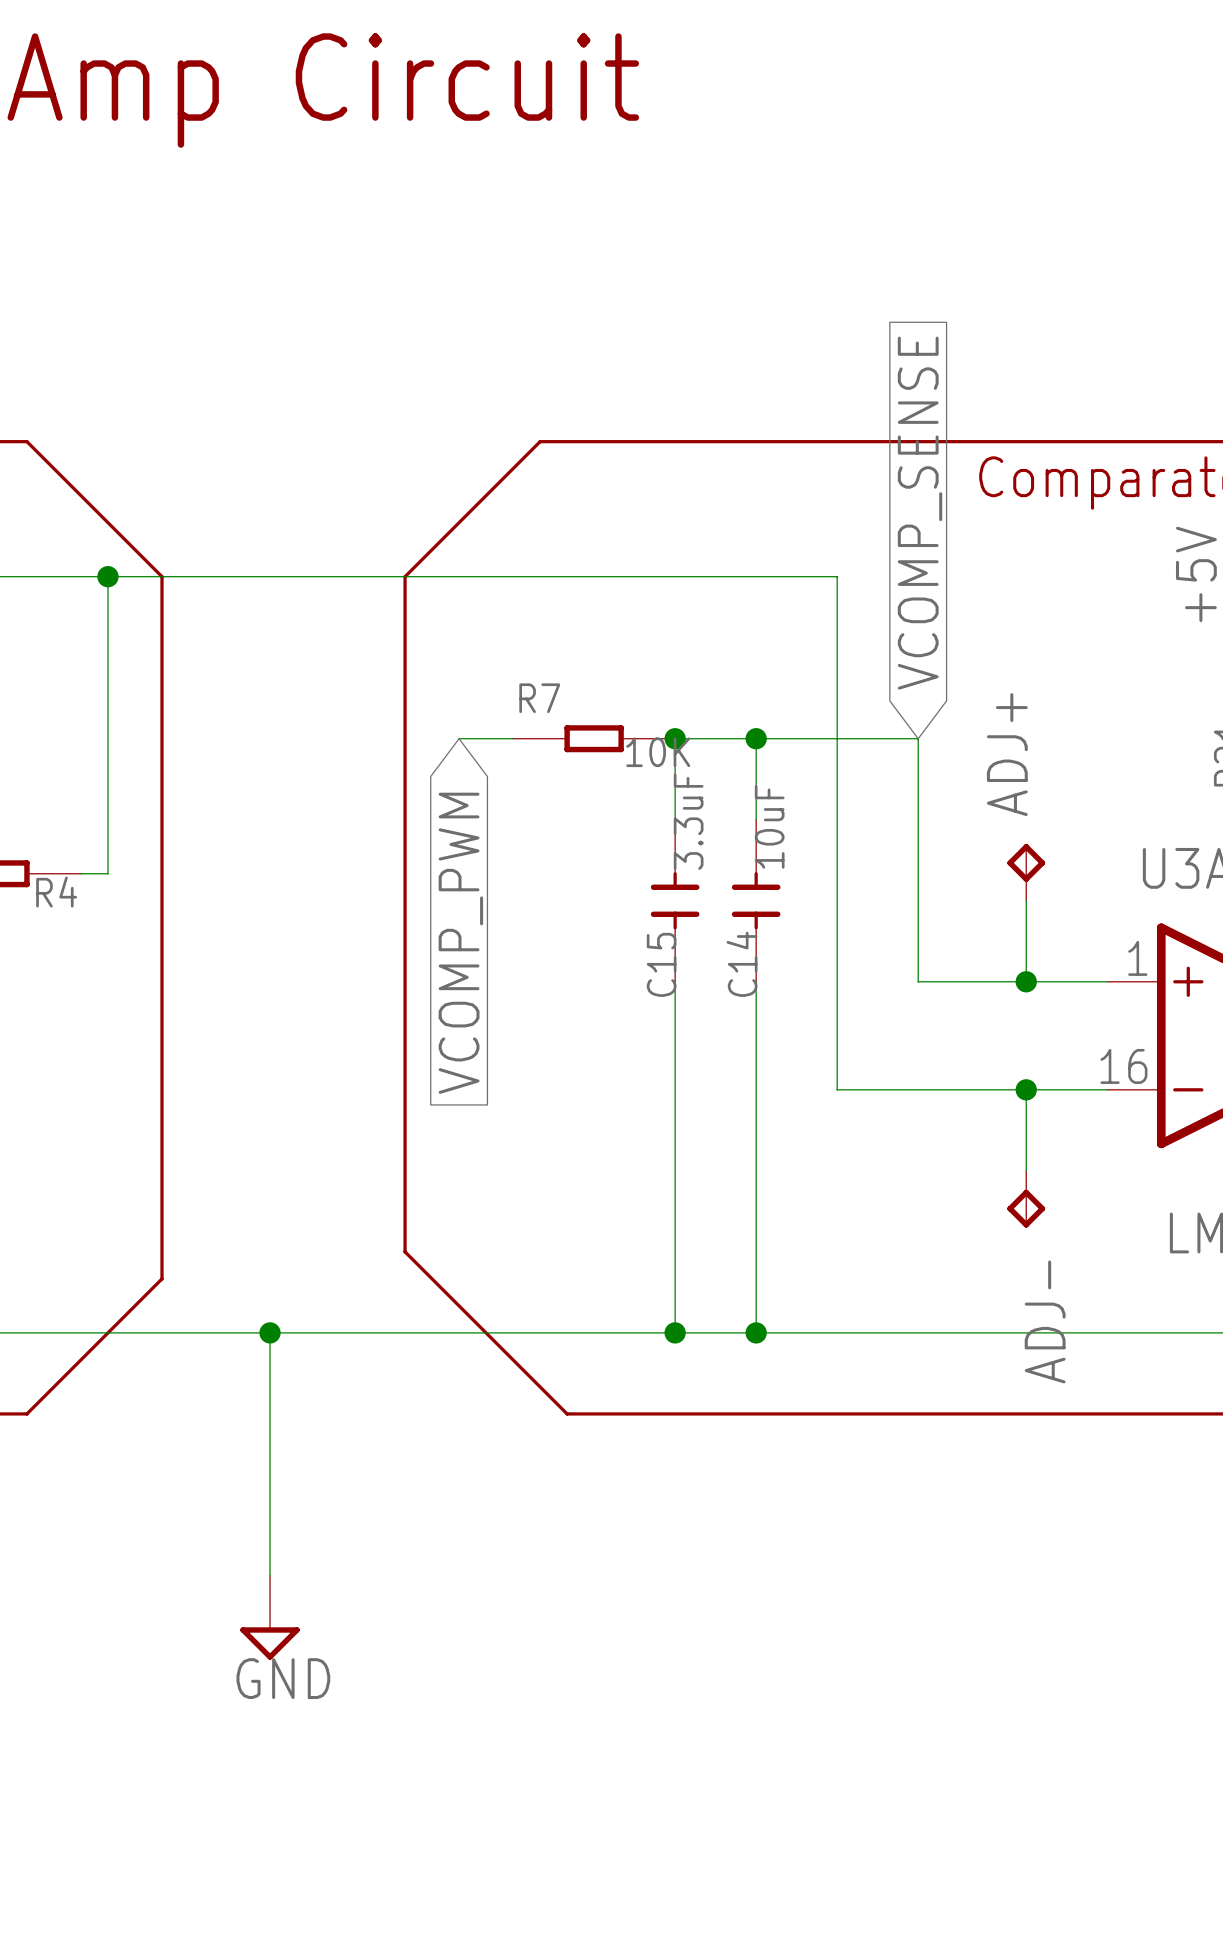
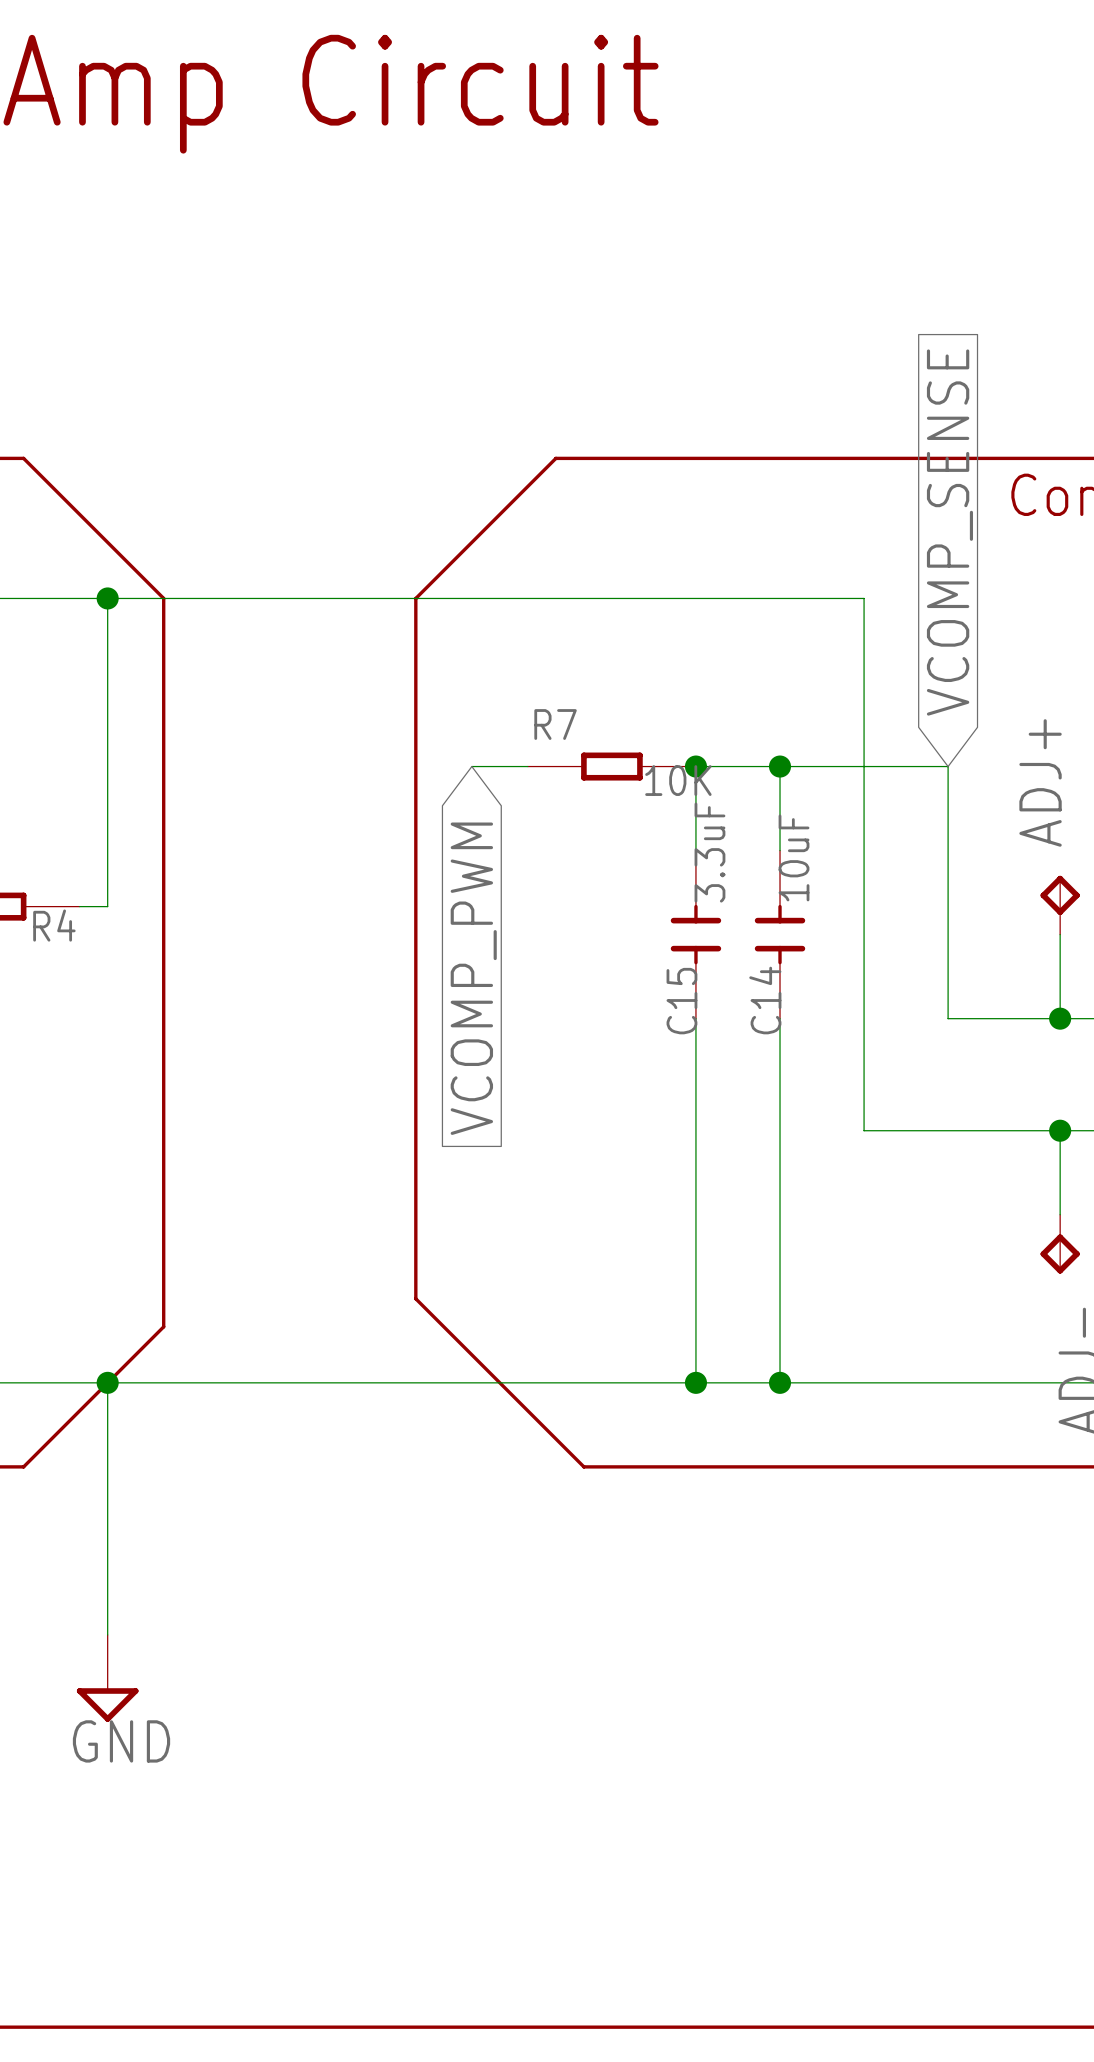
junction: none -> (107, 1382)
wire: (270, 1332) (270, 1575) -> (107, 1382) (107, 1634)
junction: (270, 1332) -> none
power symbol position: GND (270, 1617) -> GND (107, 1678)

